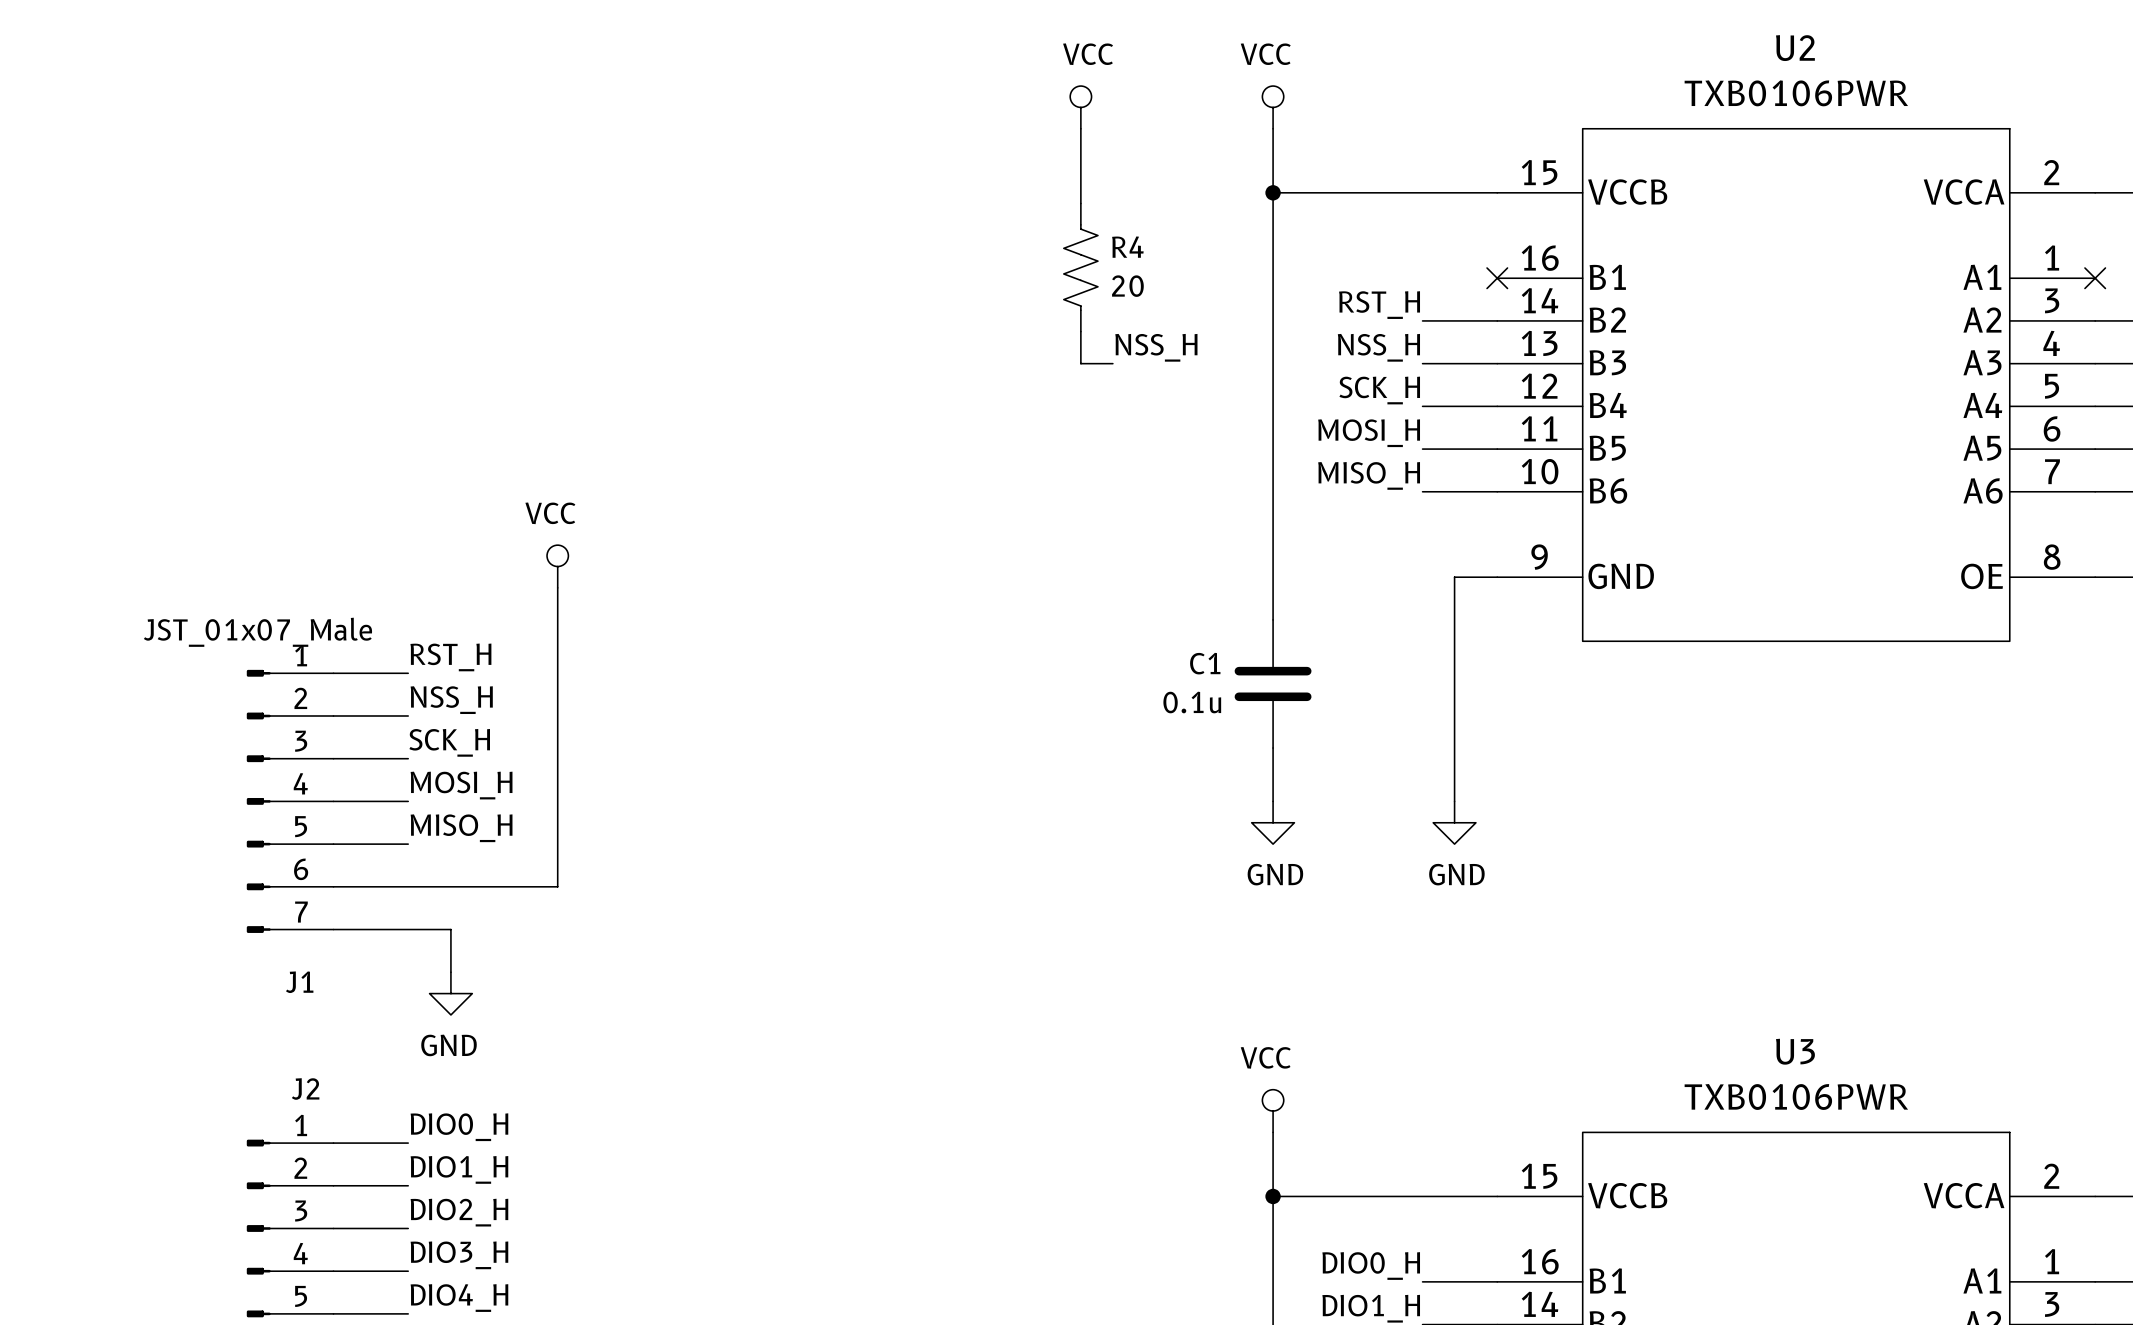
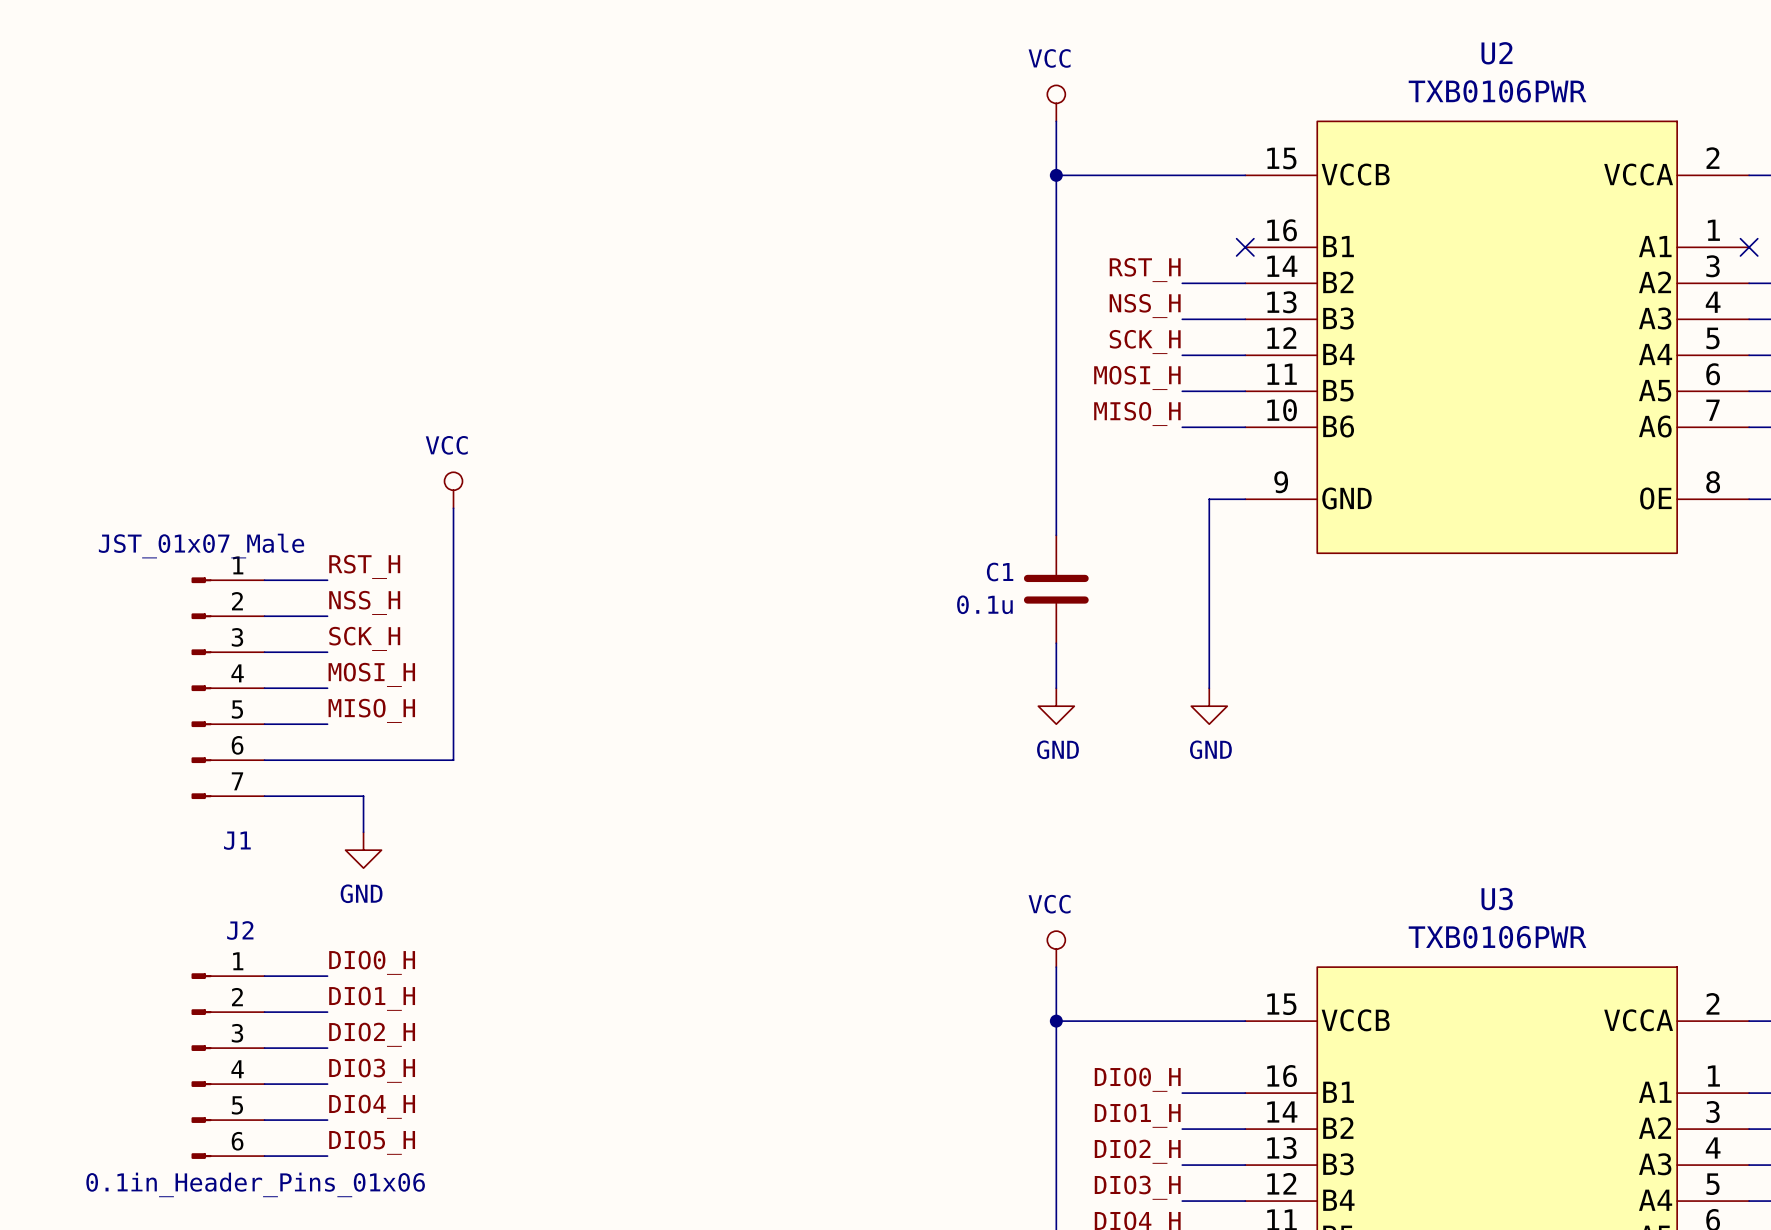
power symbol: VCC (1080, 107) -> none
wire: (1080, 128) (1080, 203) -> none
R4: 20 (1080, 267) -> none
wire: (1080, 331) (1080, 363) (1112, 363) -> none
label: NSS_H (1156, 347) -> none

